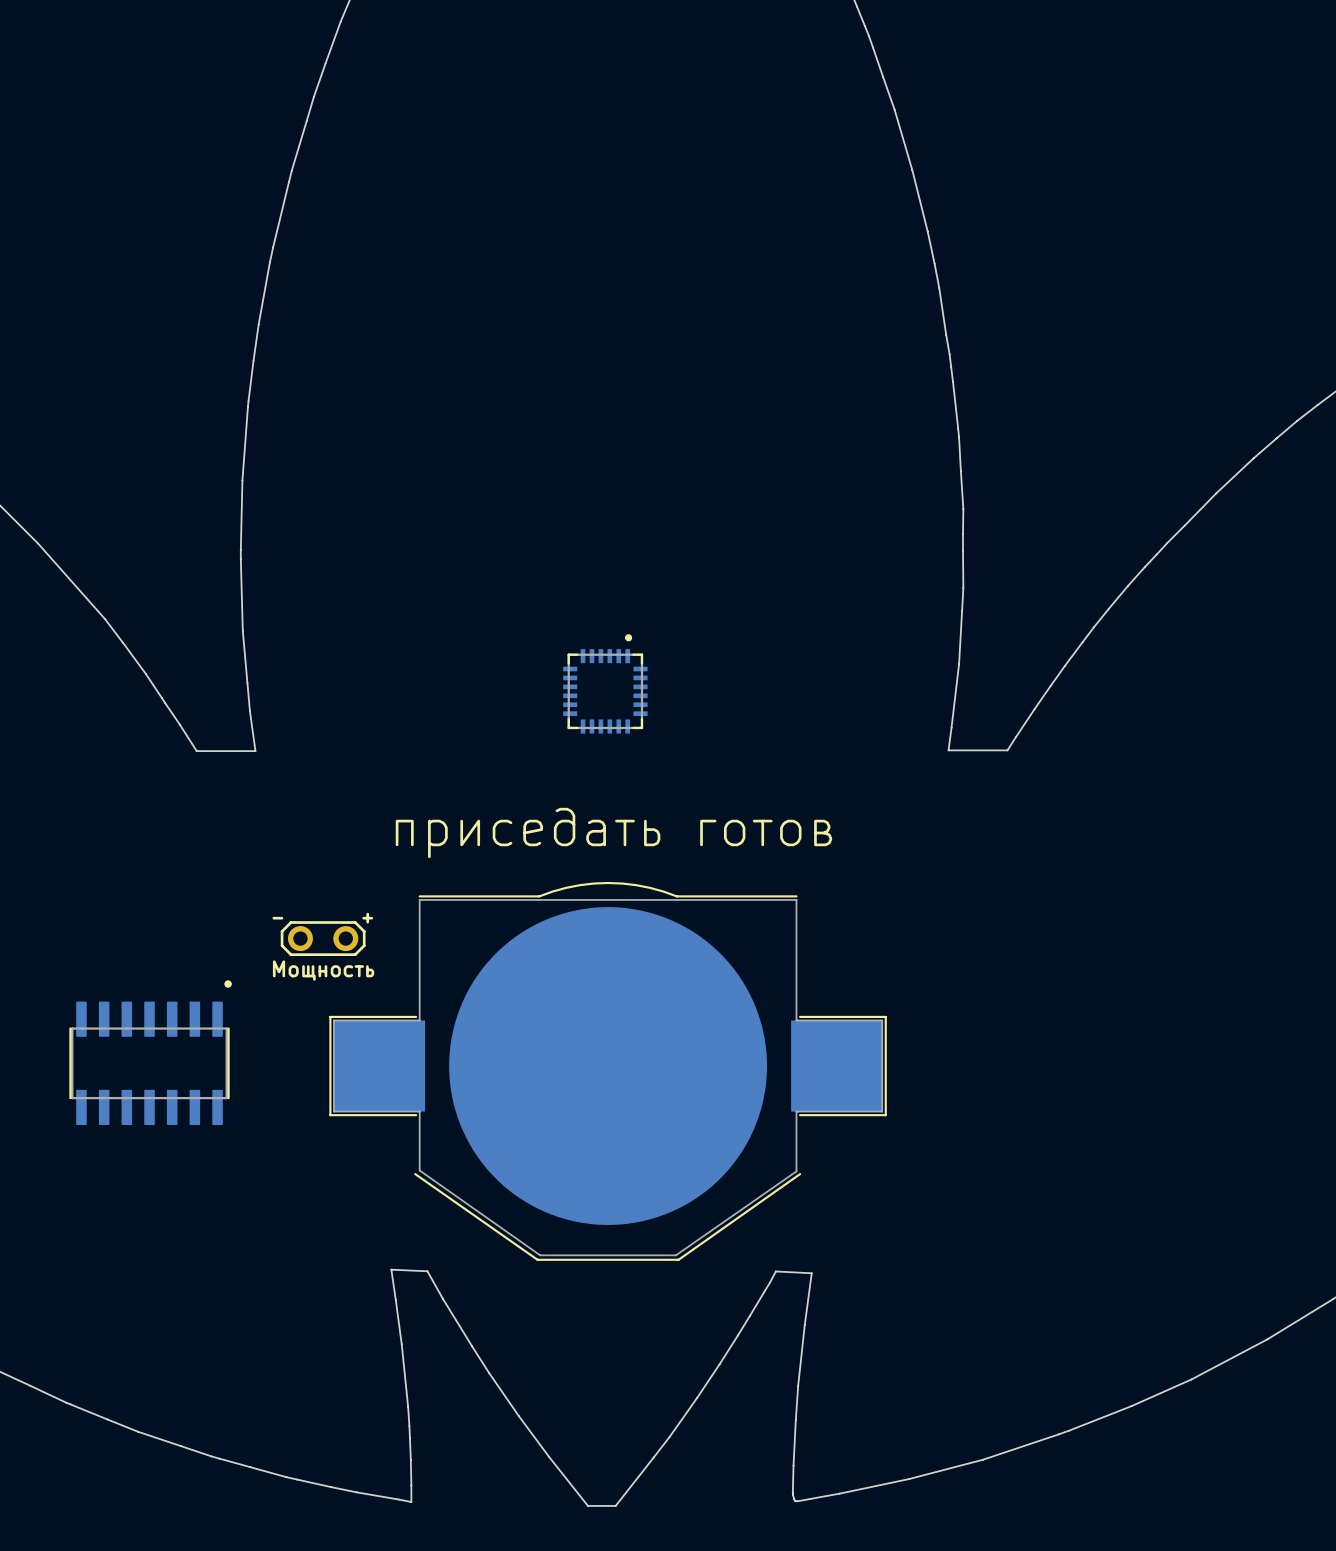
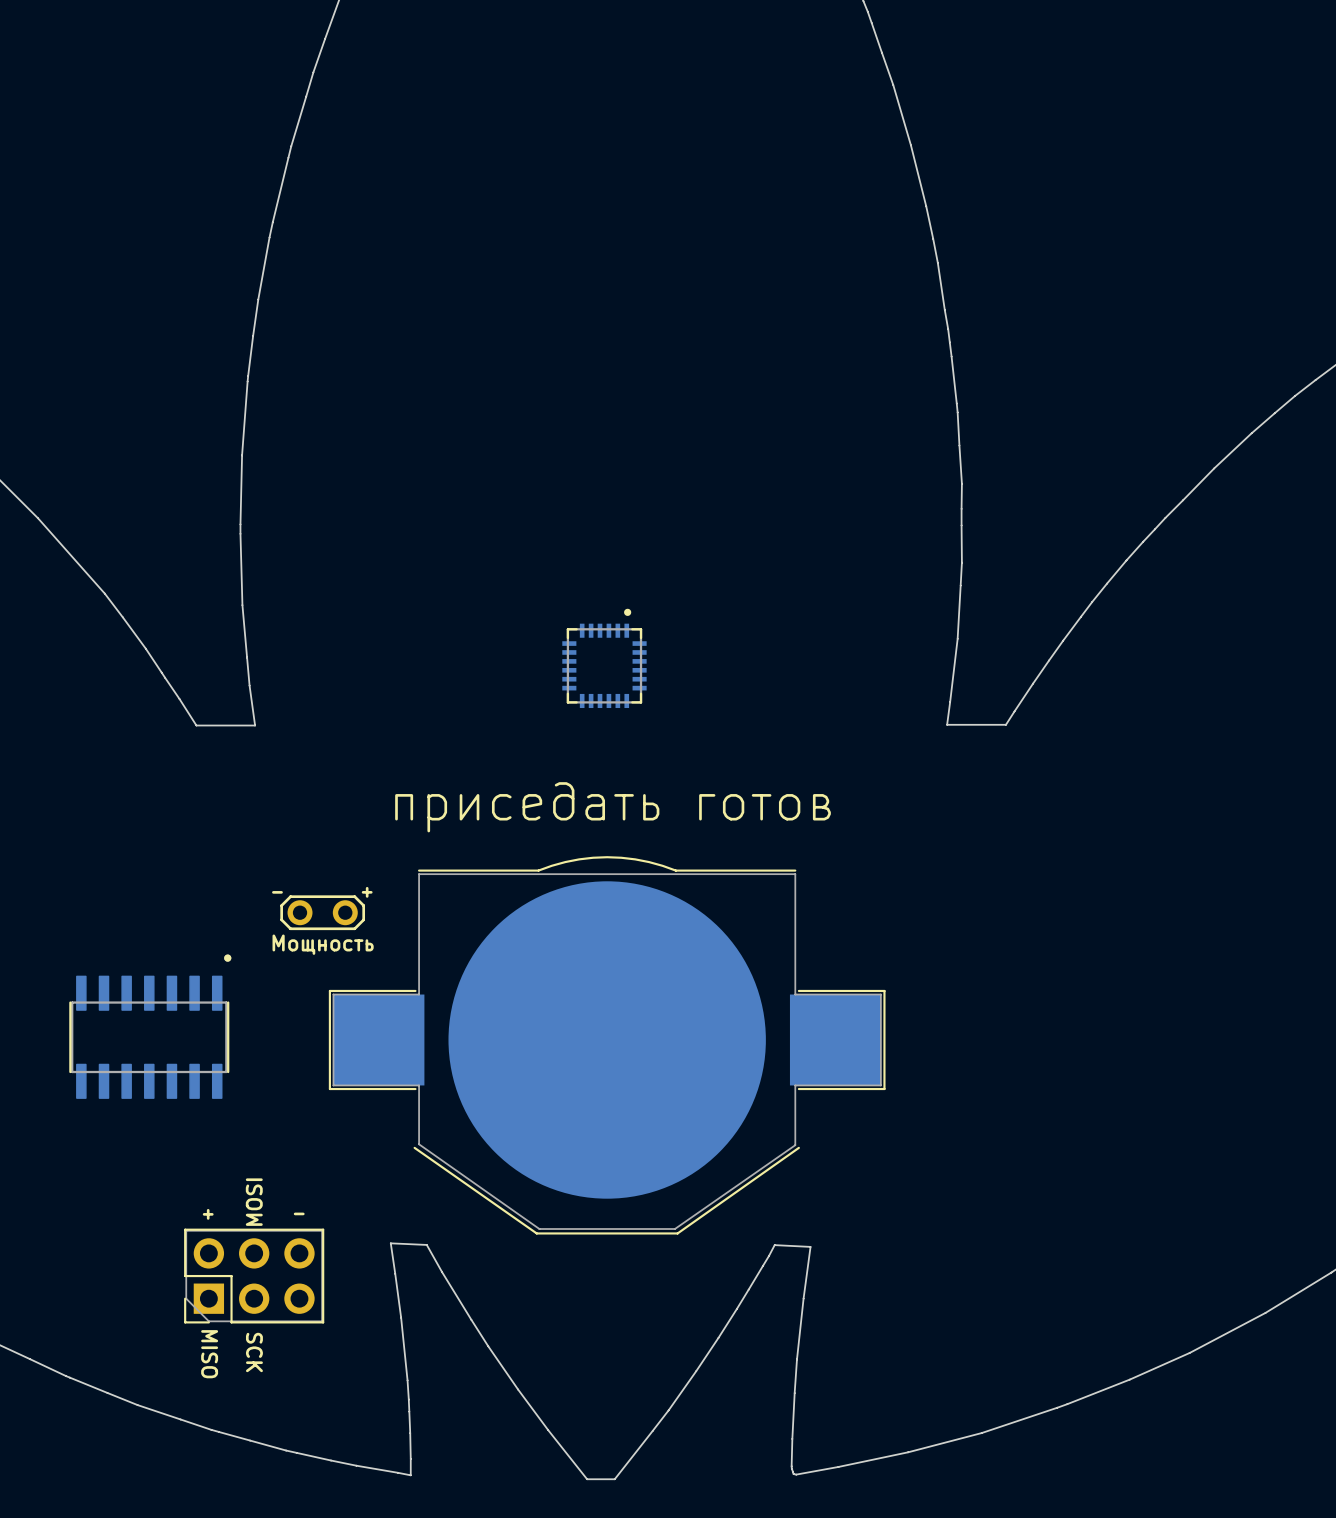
text: none -> MOSI (254, 1202)
text: none -> + (208, 1214)
text: none -> - (299, 1213)
part: none -> (254, 1276)
text: none -> SCK (254, 1352)
text: none -> MISO (209, 1354)

